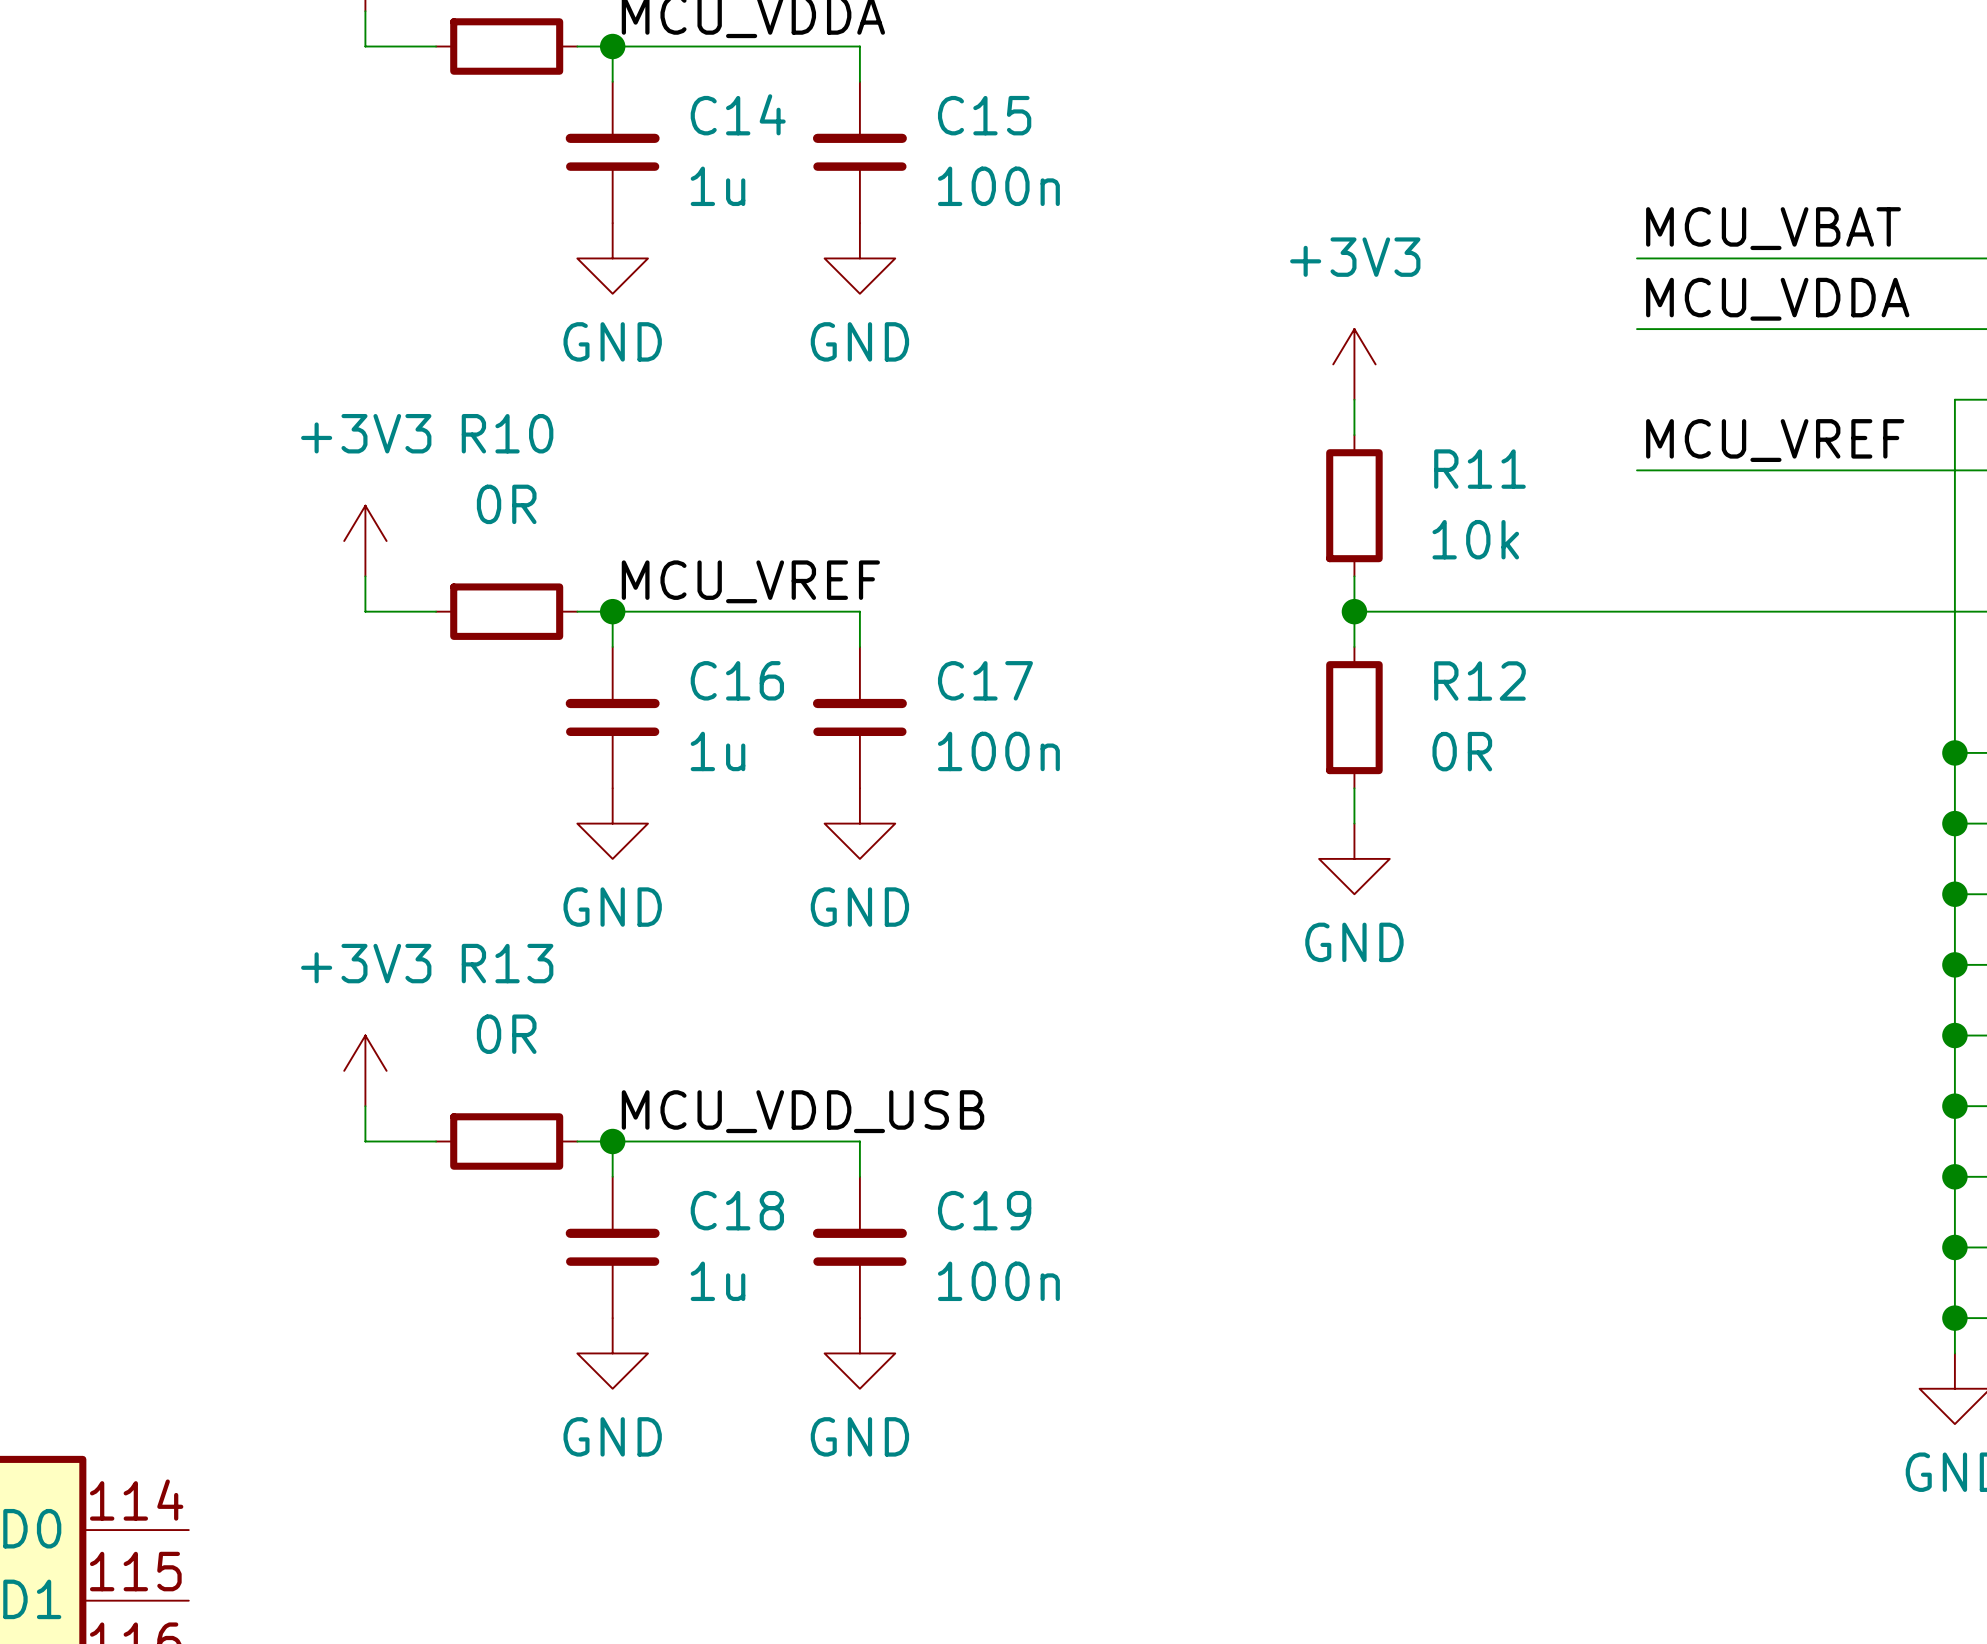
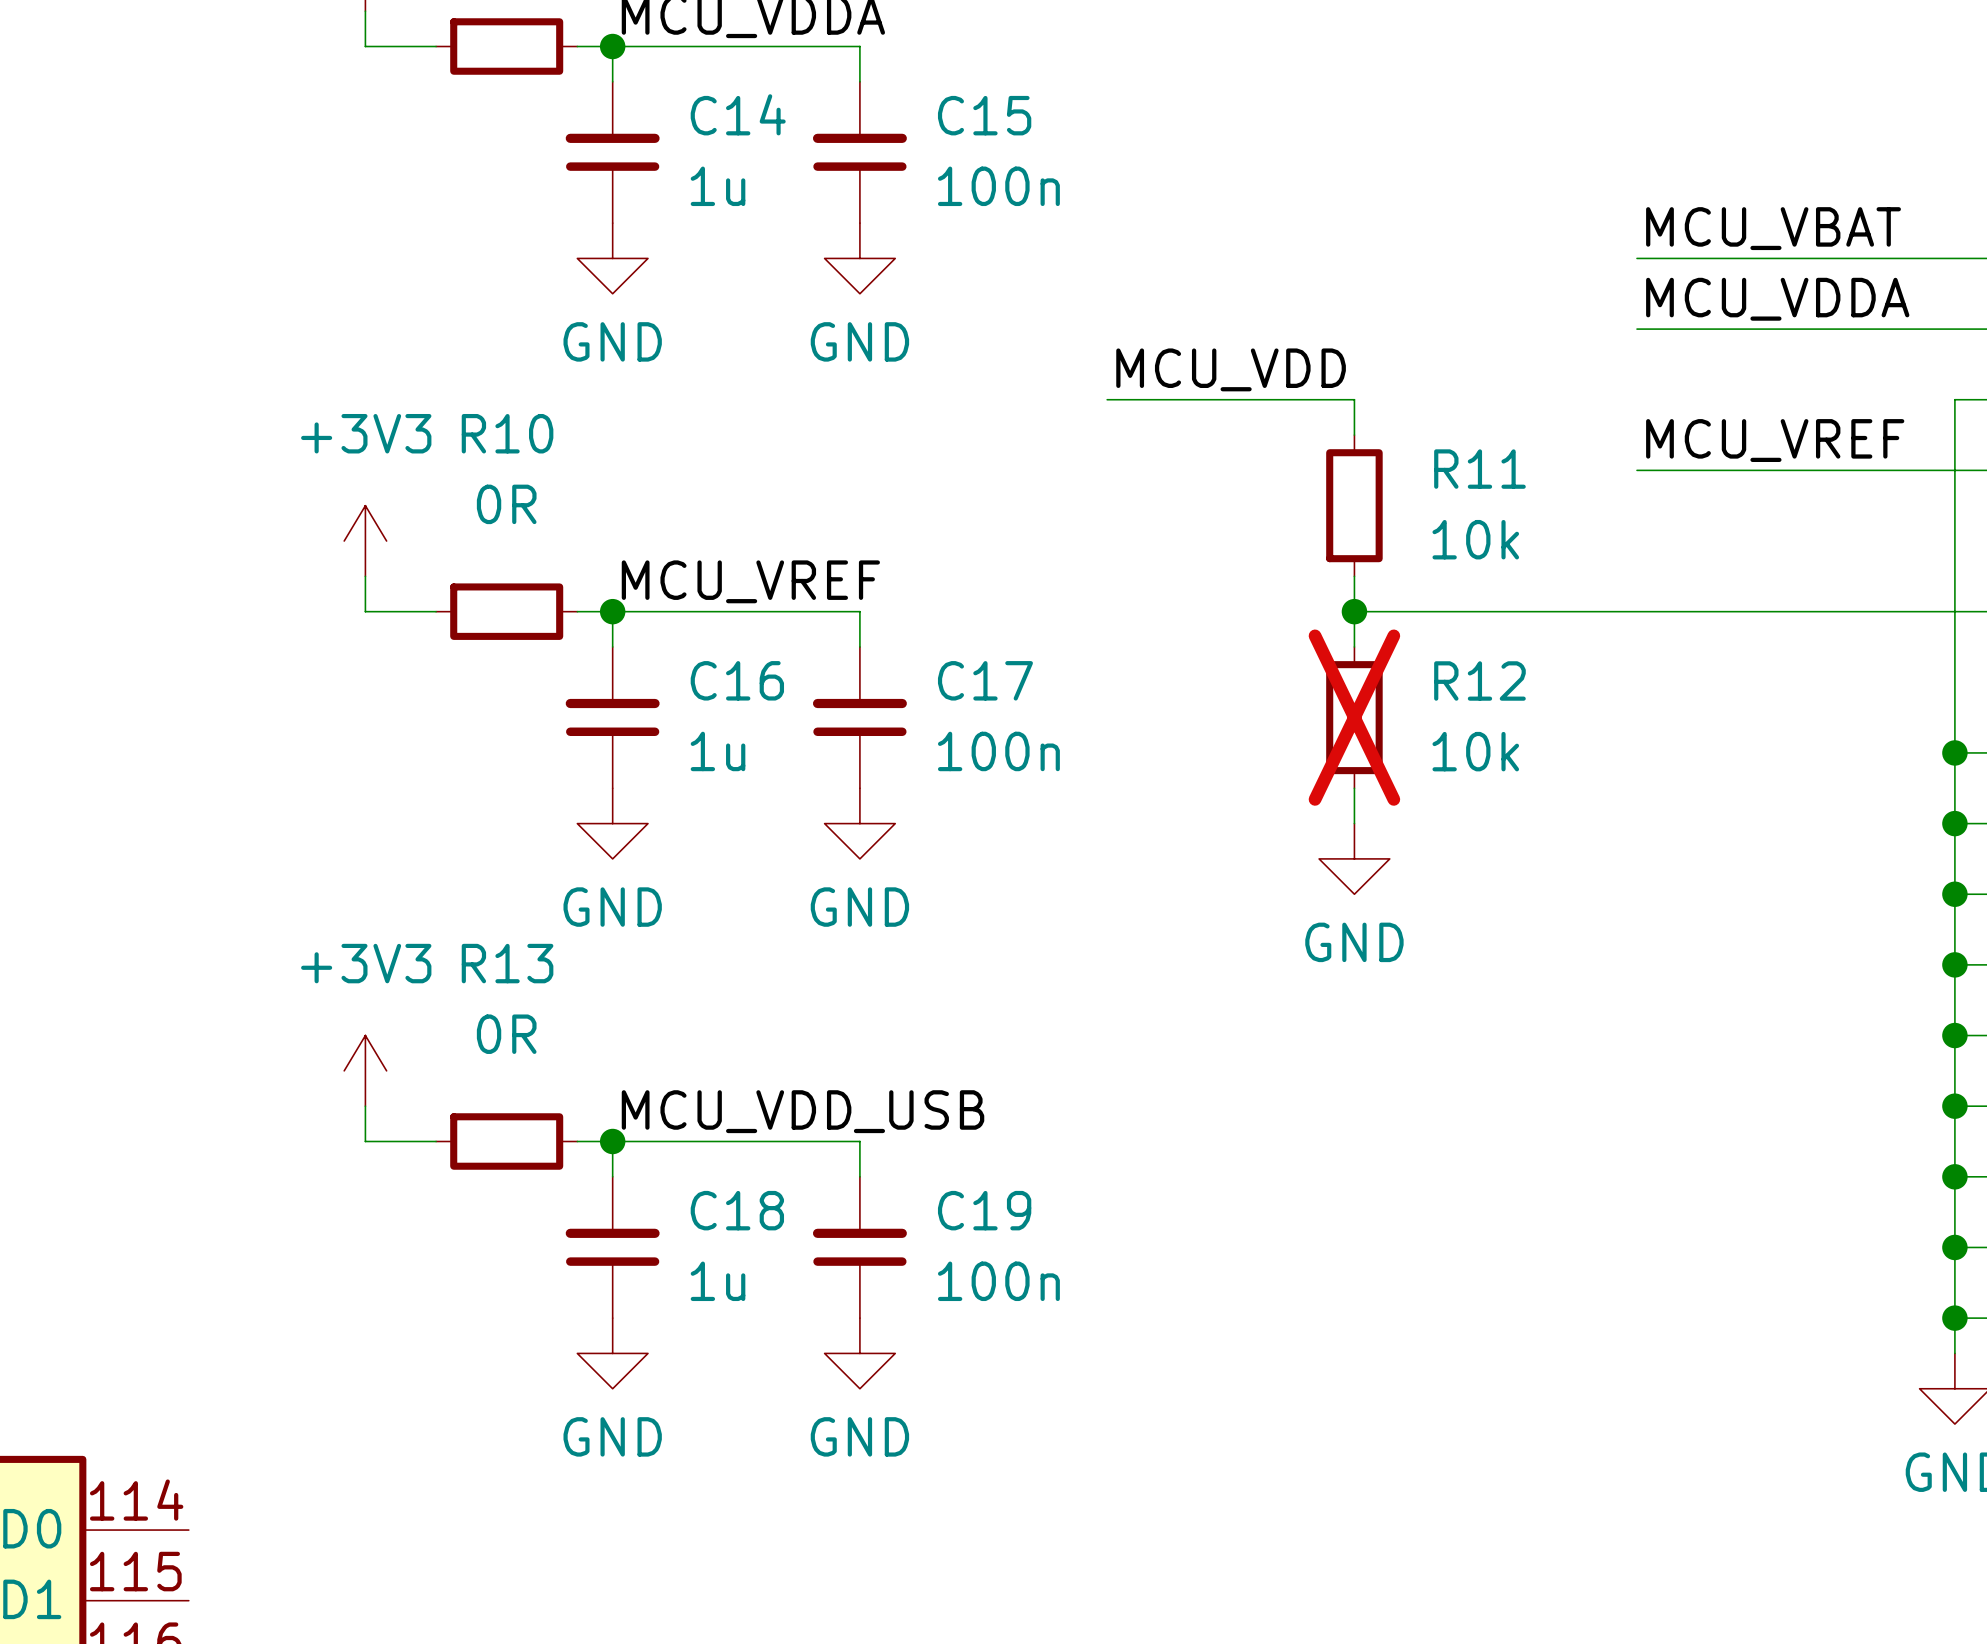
power symbol: +3V3 (1354, 364) -> none
label: none -> MCU_VDD (1231, 369)
wire: none -> (1107, 399) (1354, 399)
R12 do-not-place cross: none -> (1354, 717)
R12 text: 0R (1462, 751) -> 10k (1475, 751)

